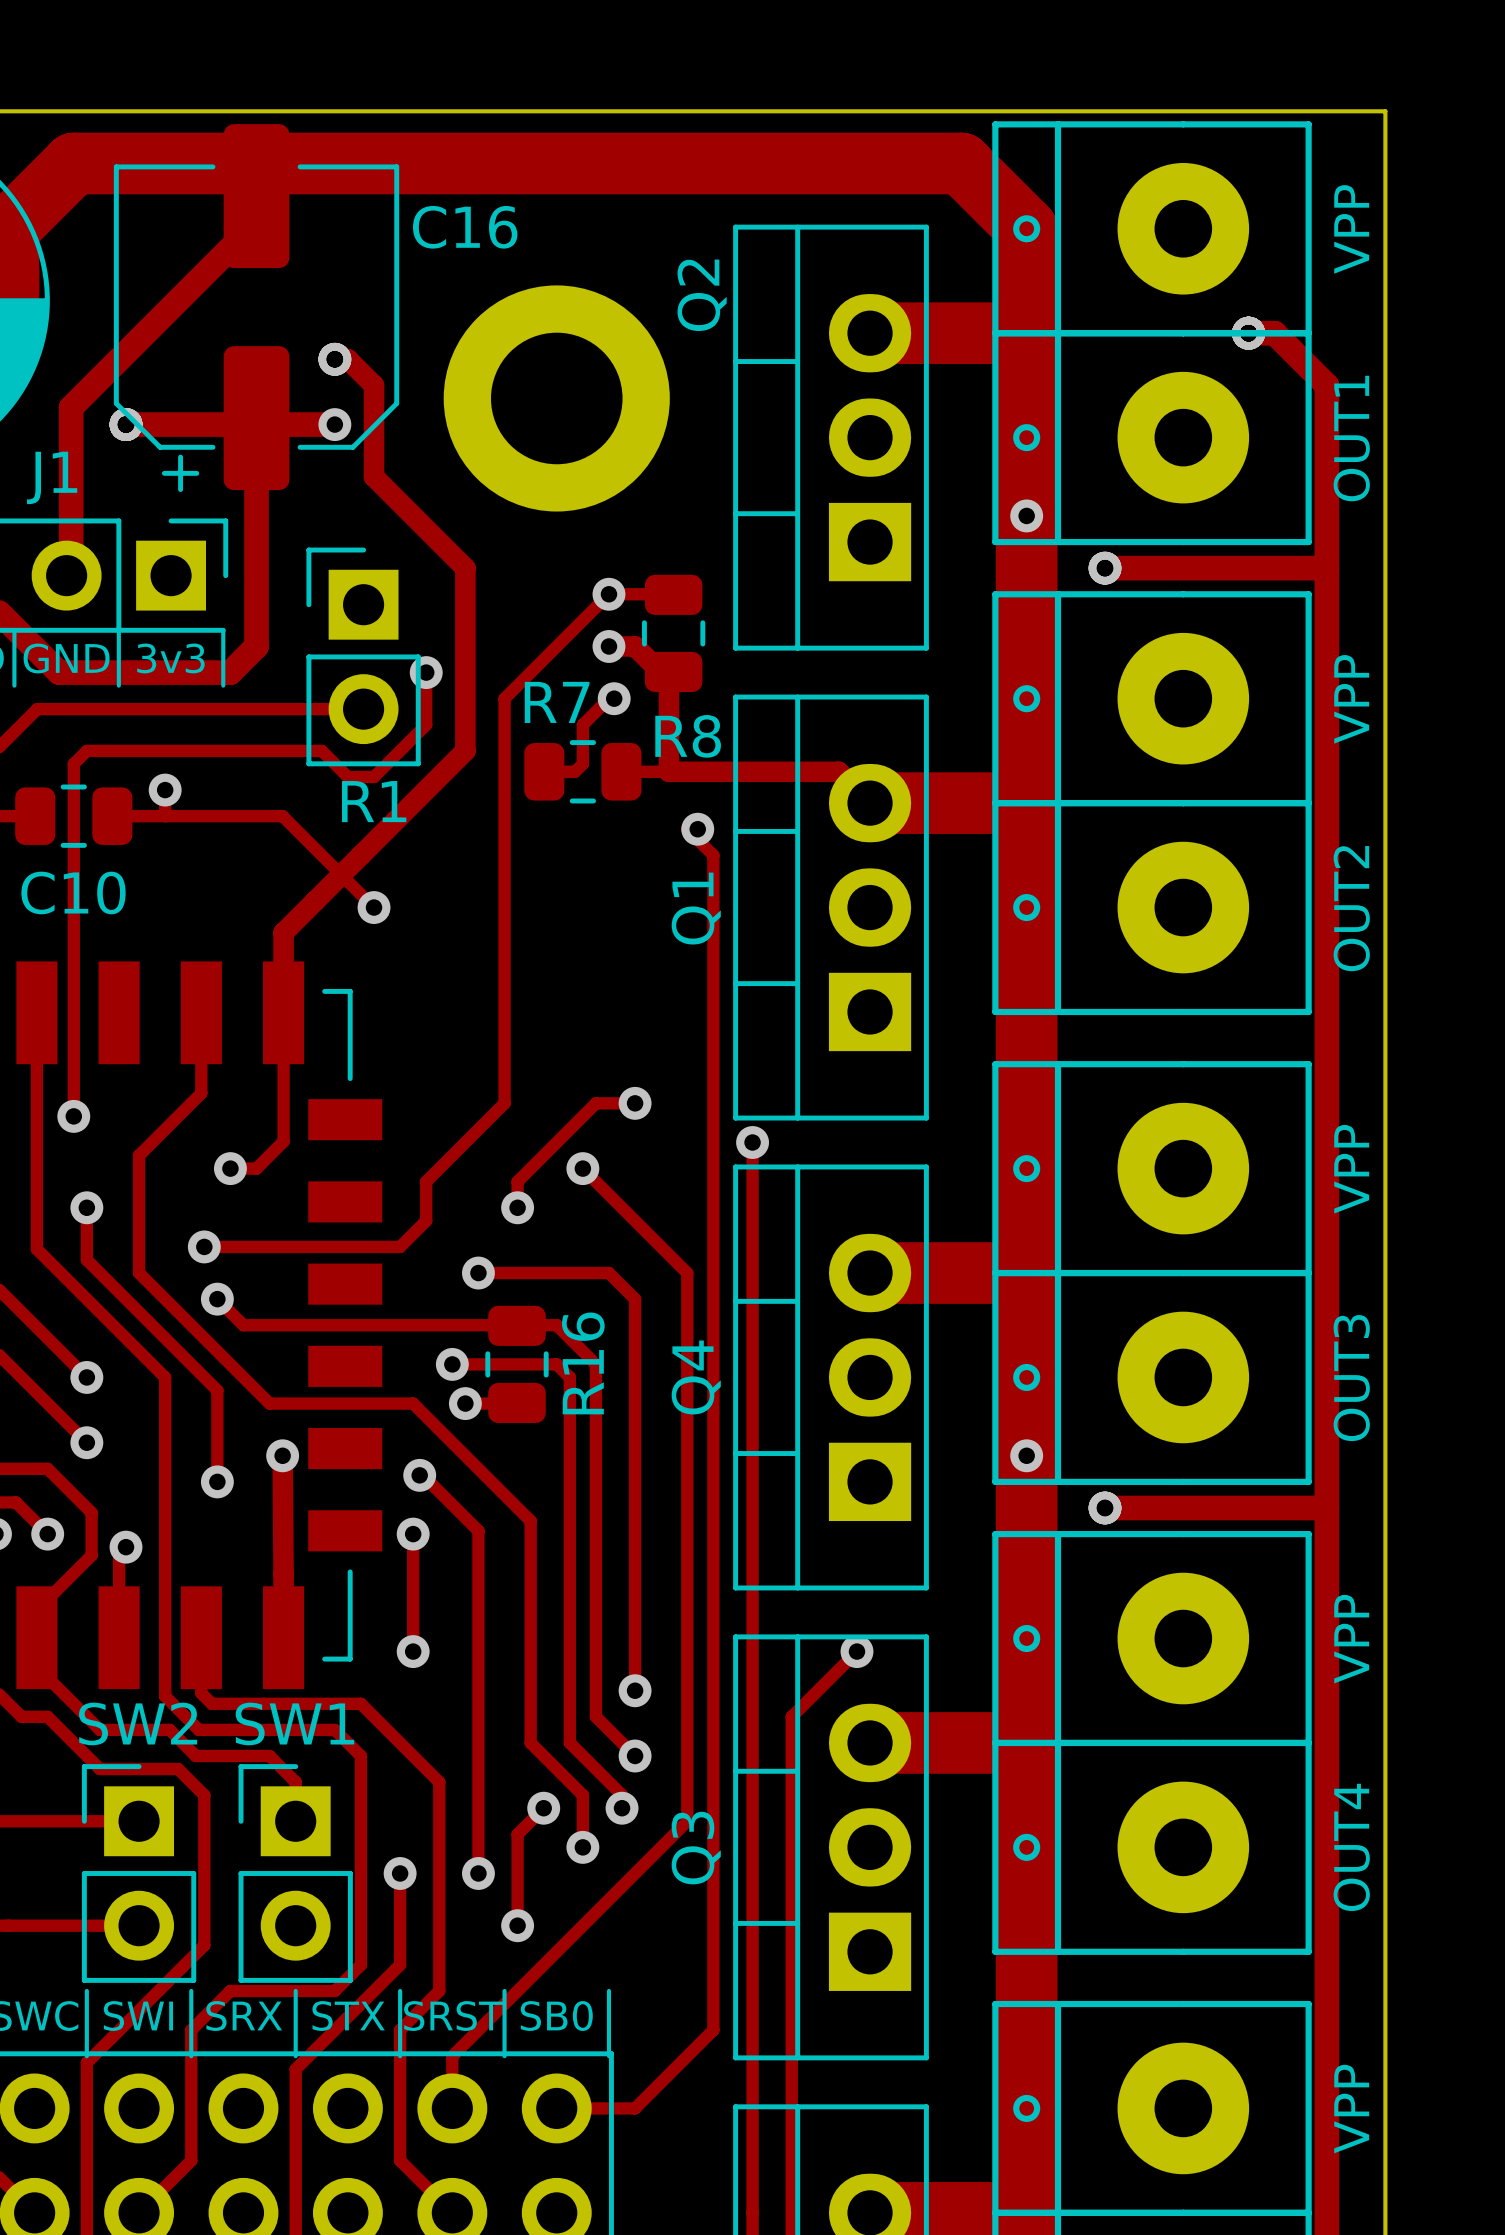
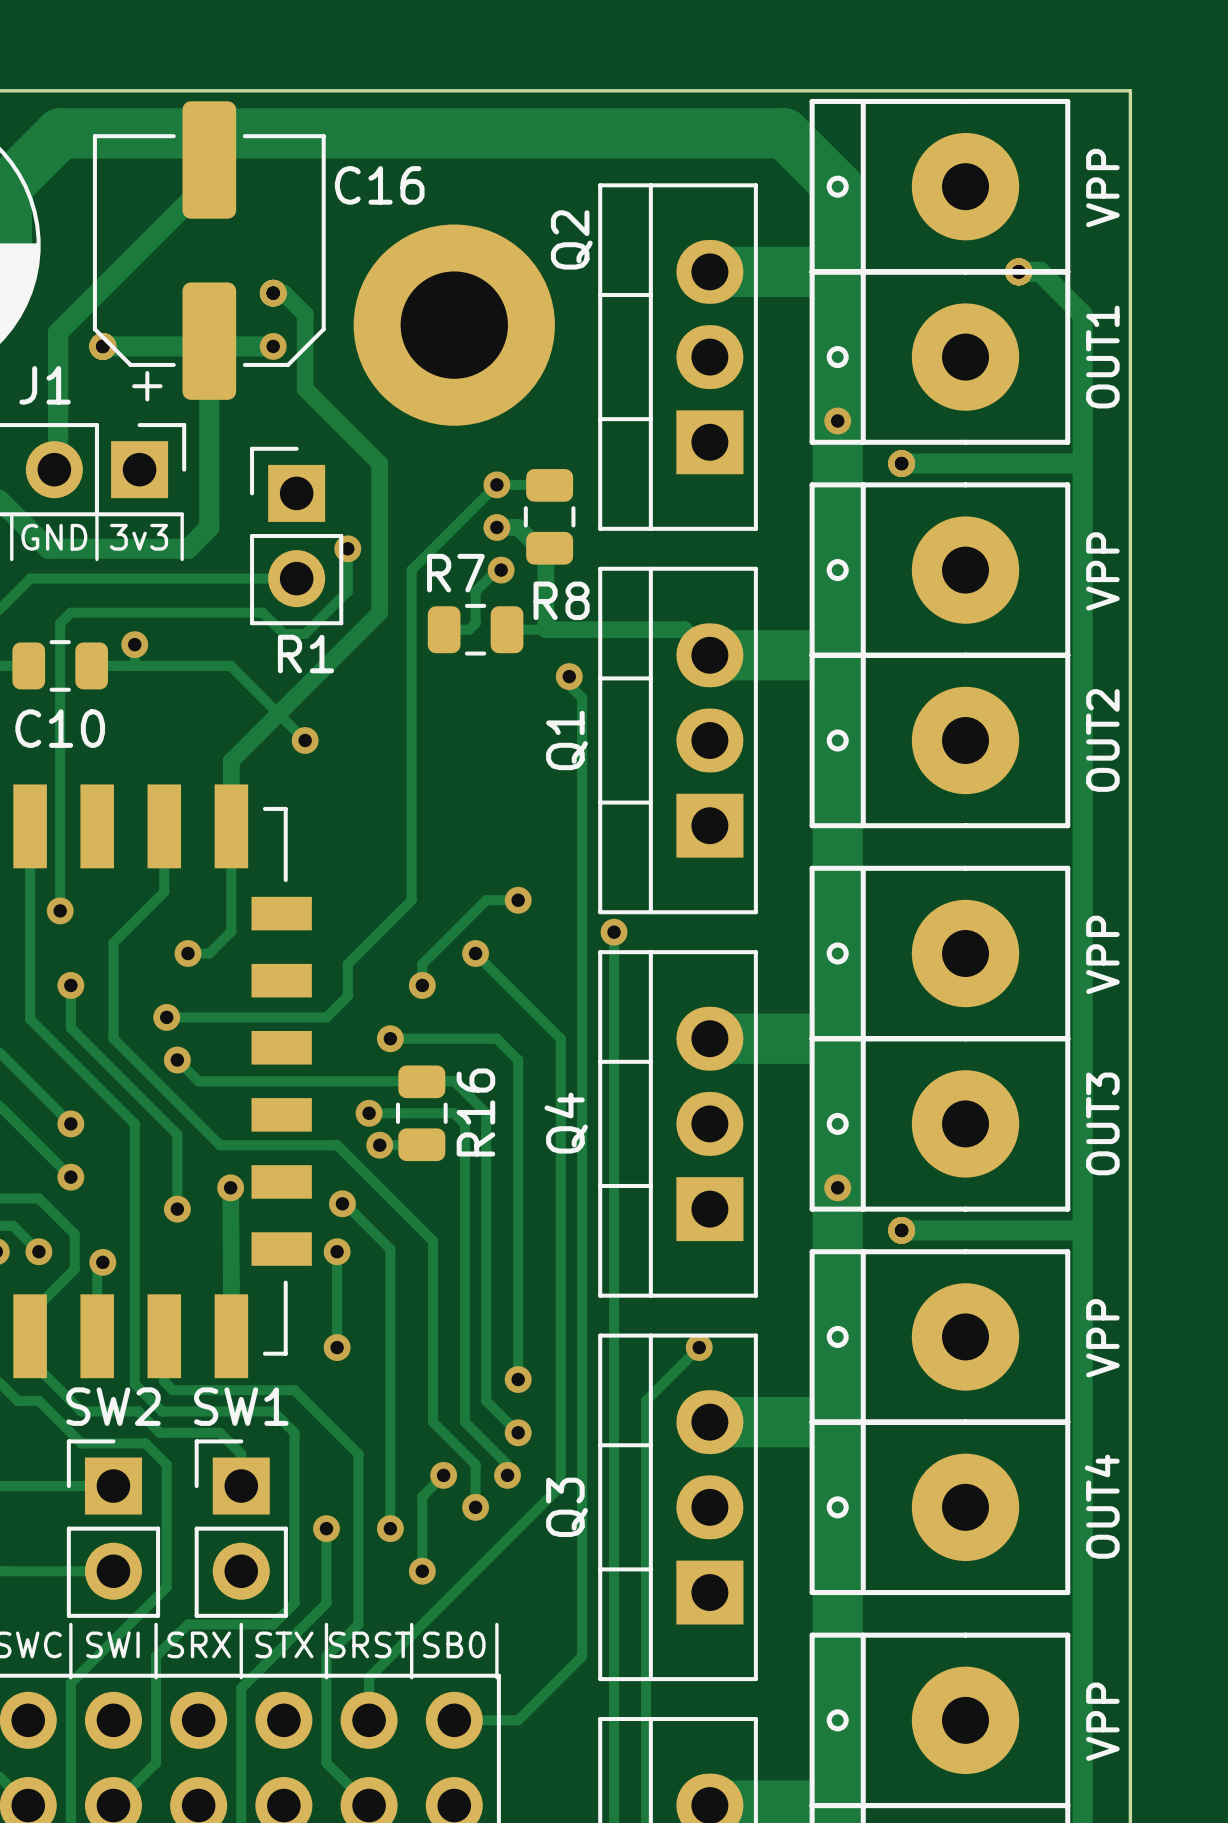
part footprint: [443, 285, 670, 512] -> [353, 224, 555, 426]

